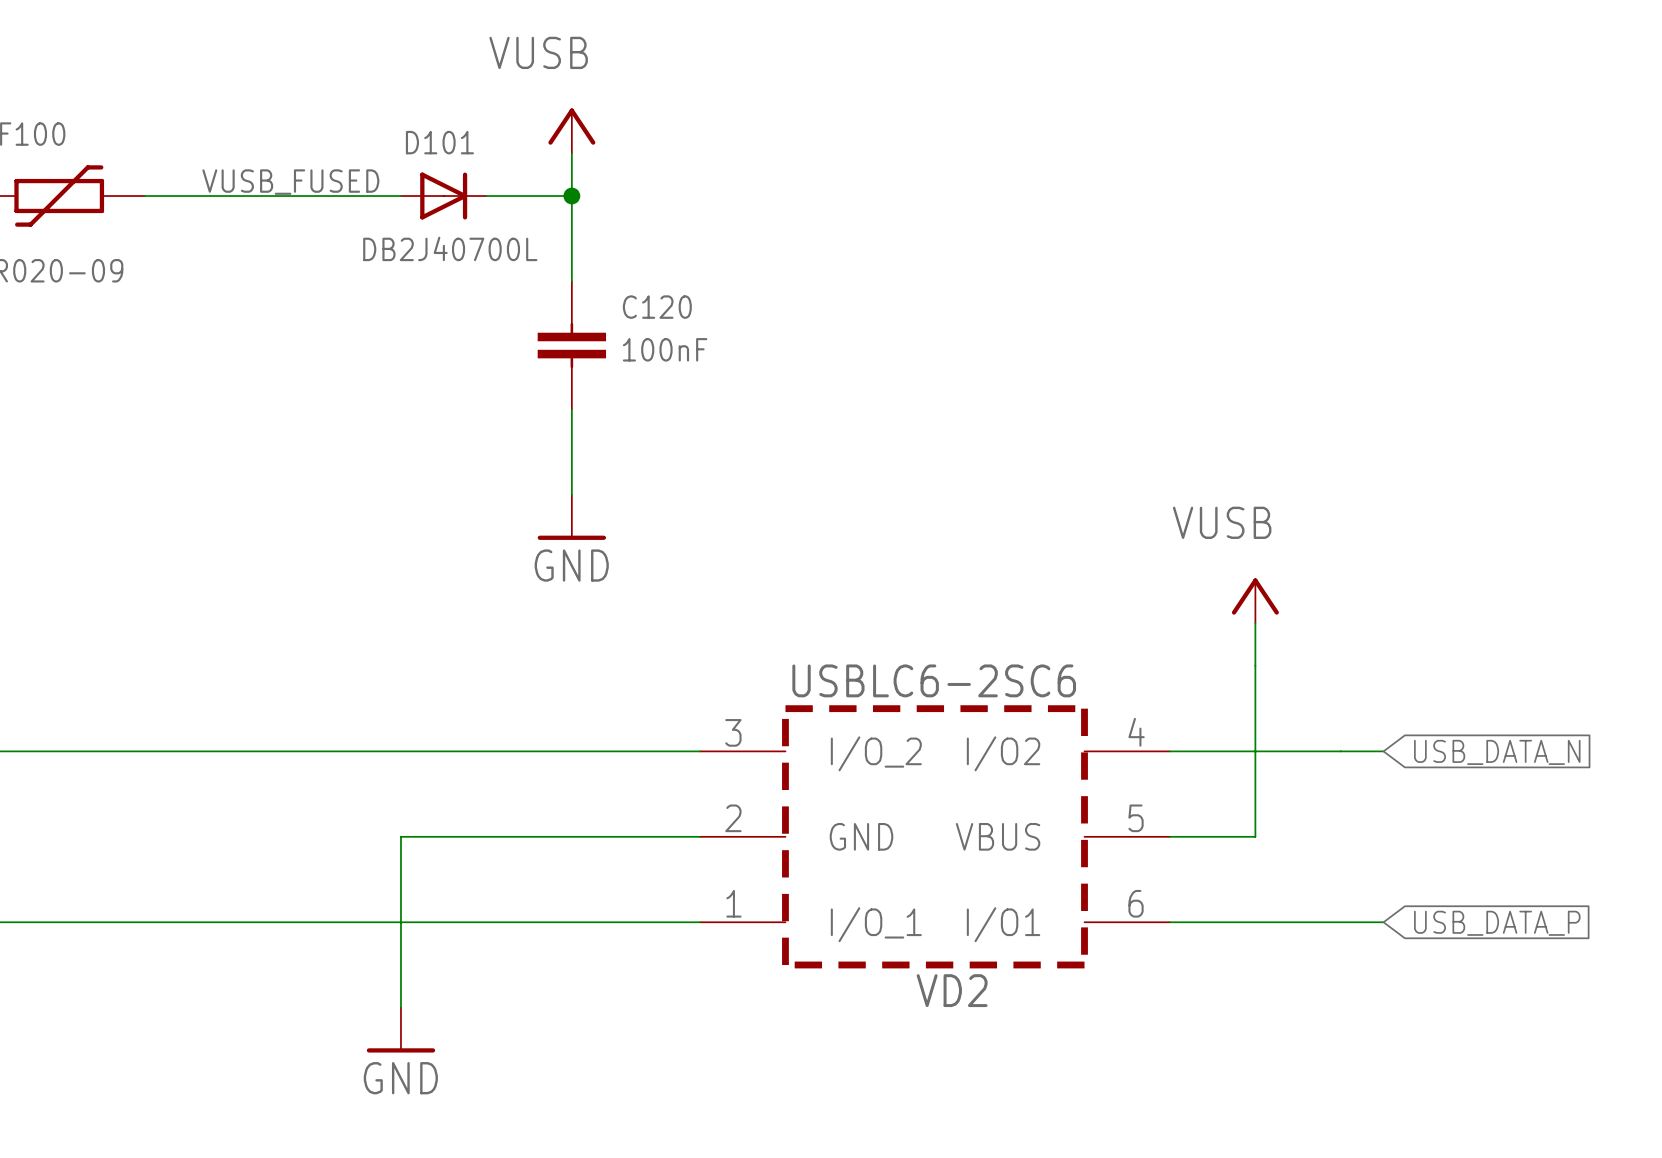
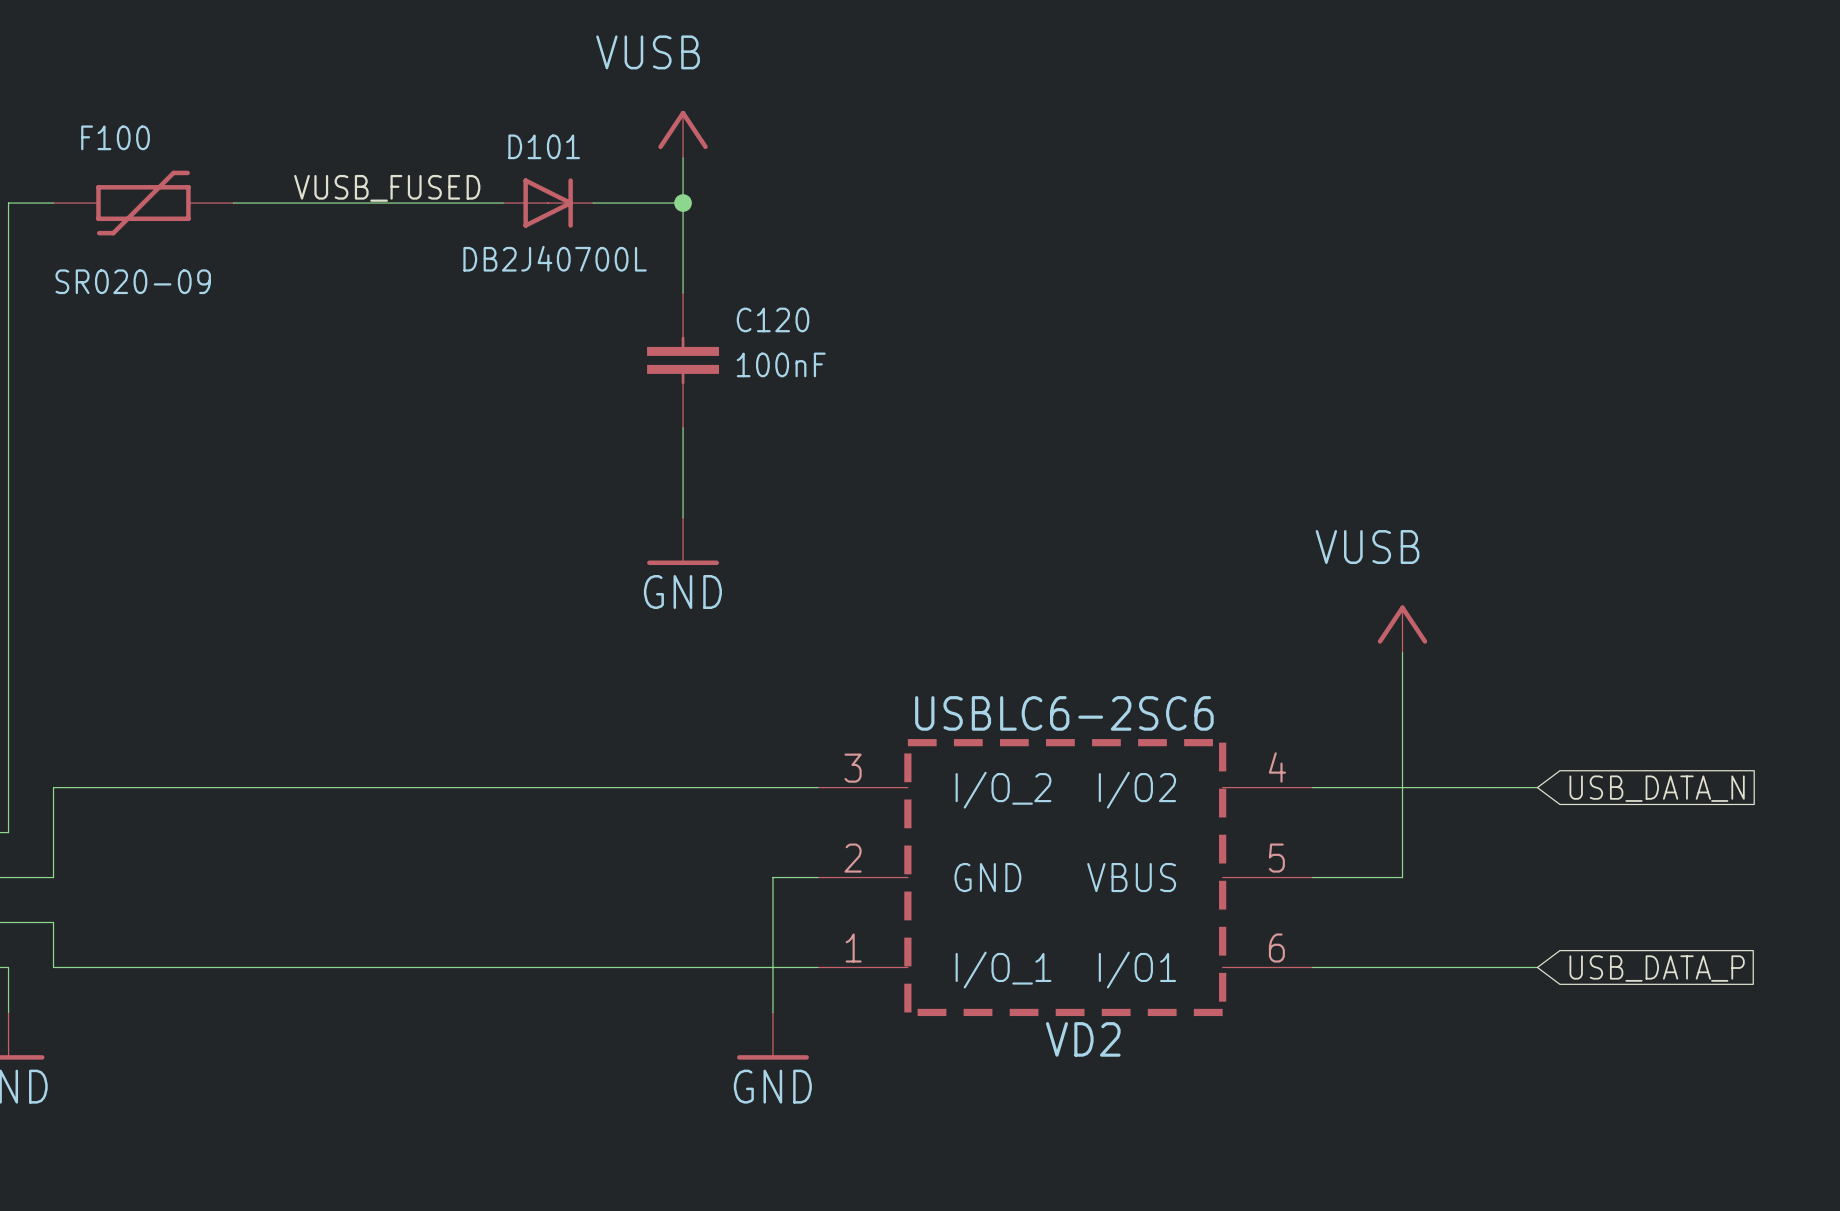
wire: (657, 836) (400, 836) (400, 1007) -> (772, 877) (772, 1012)
power symbol position: GND (400, 1030) -> GND (772, 1036)

